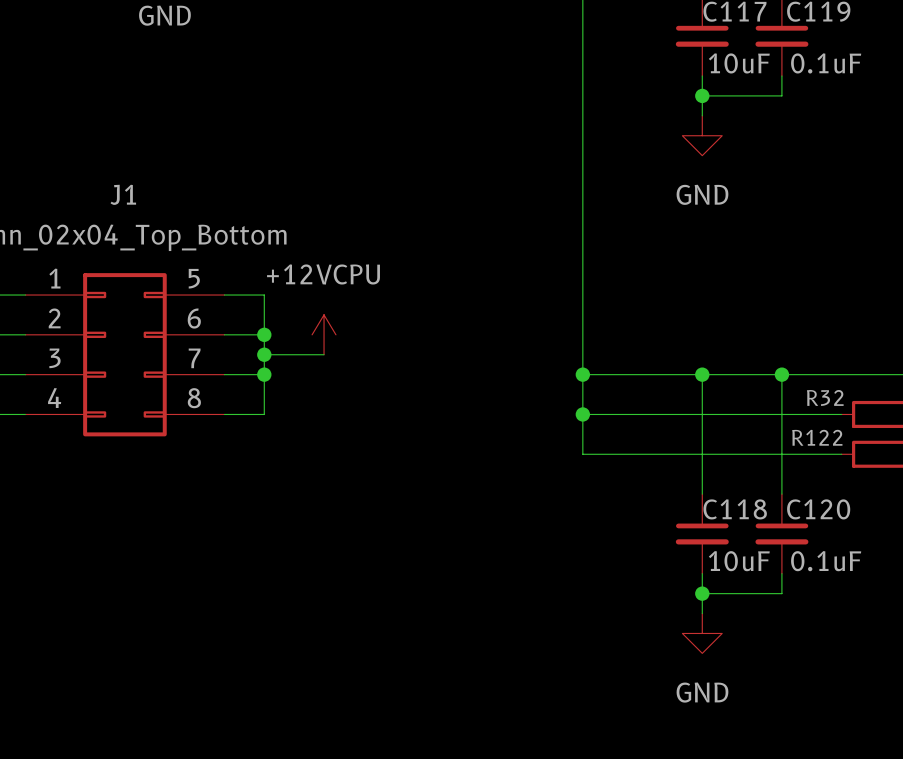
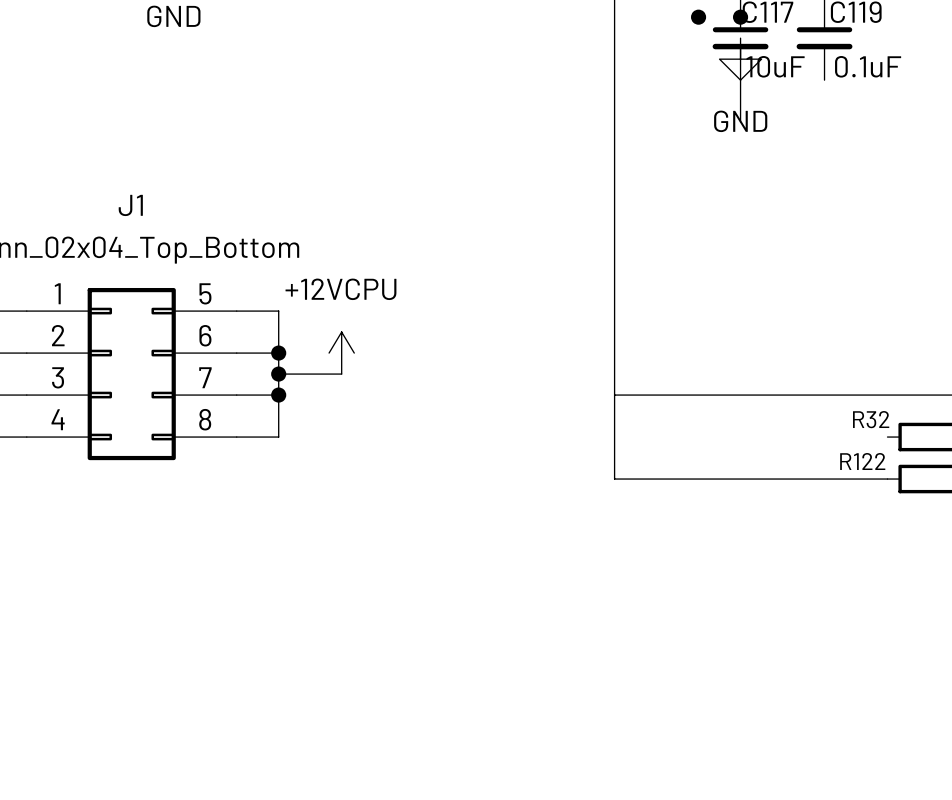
junction: none -> (698, 17)
junction: none -> (740, 17)
wire: (781, 76) (781, 95) (702, 95) -> none
junction: (702, 95) -> none
power symbol position: GND (702, 135) -> GND (740, 59)
junction: (582, 374) -> none
wire: (702, 374) (702, 494) -> none
junction: (702, 374) -> none
wire: (781, 374) (781, 494) -> none
junction: (781, 374) -> none
wire: (582, 414) (841, 414) -> none
junction: (582, 414) -> none
C118: 10uF (702, 533) -> none
C120: 0.1uF (781, 533) -> none
wire: (702, 573) (702, 613) -> none
wire: (781, 573) (781, 593) (702, 593) -> none
junction: (702, 593) -> none
power symbol: GND (702, 633) -> none

